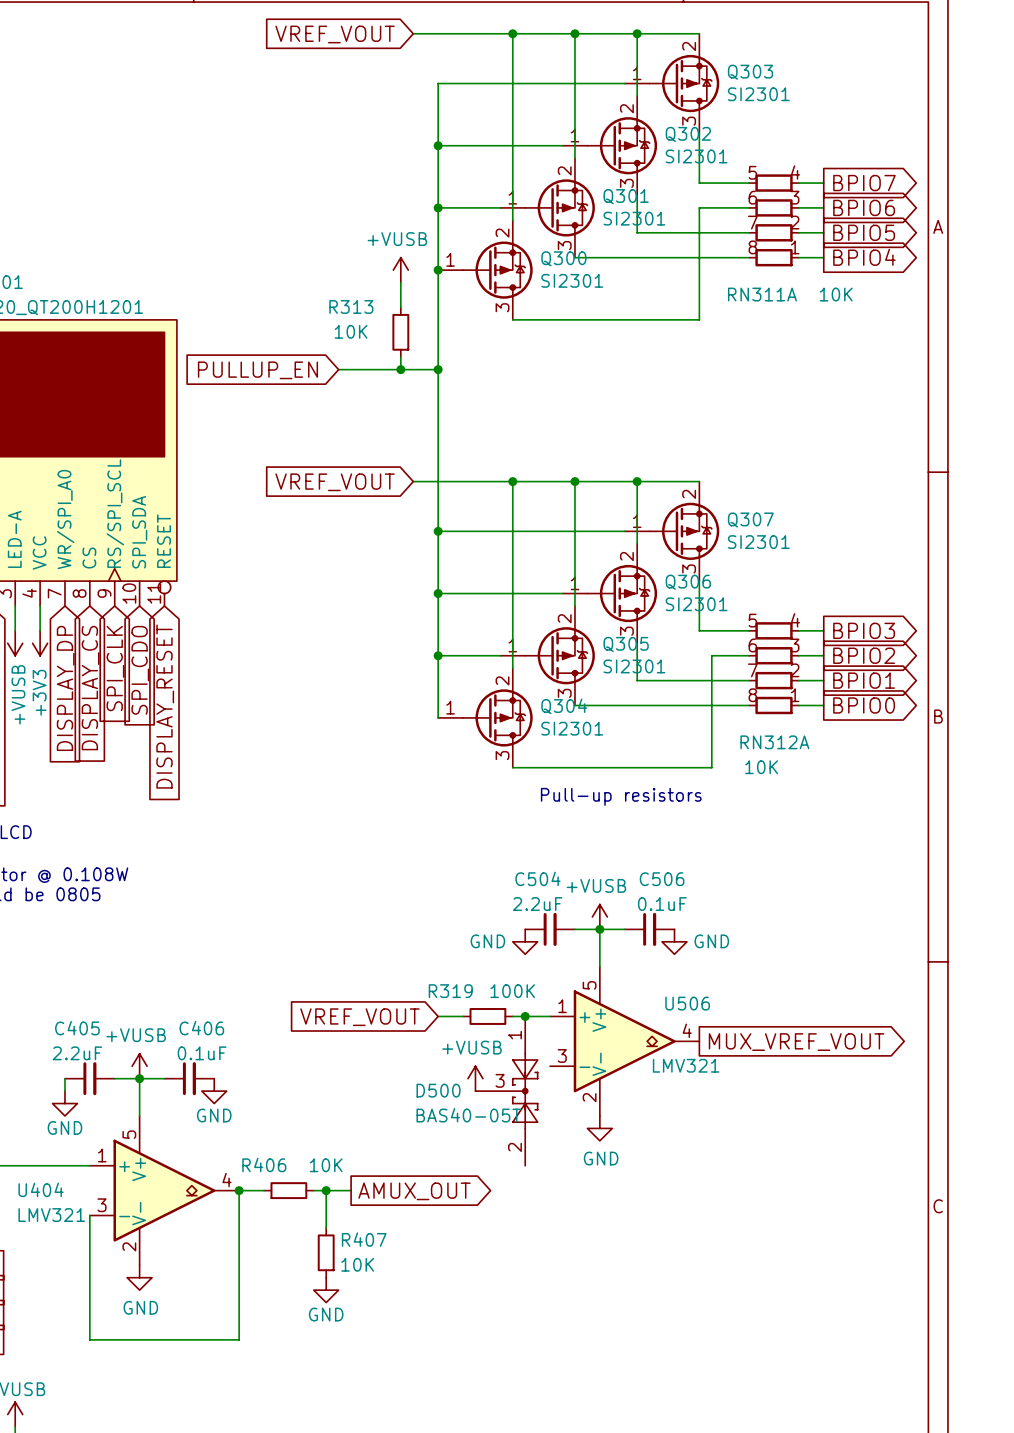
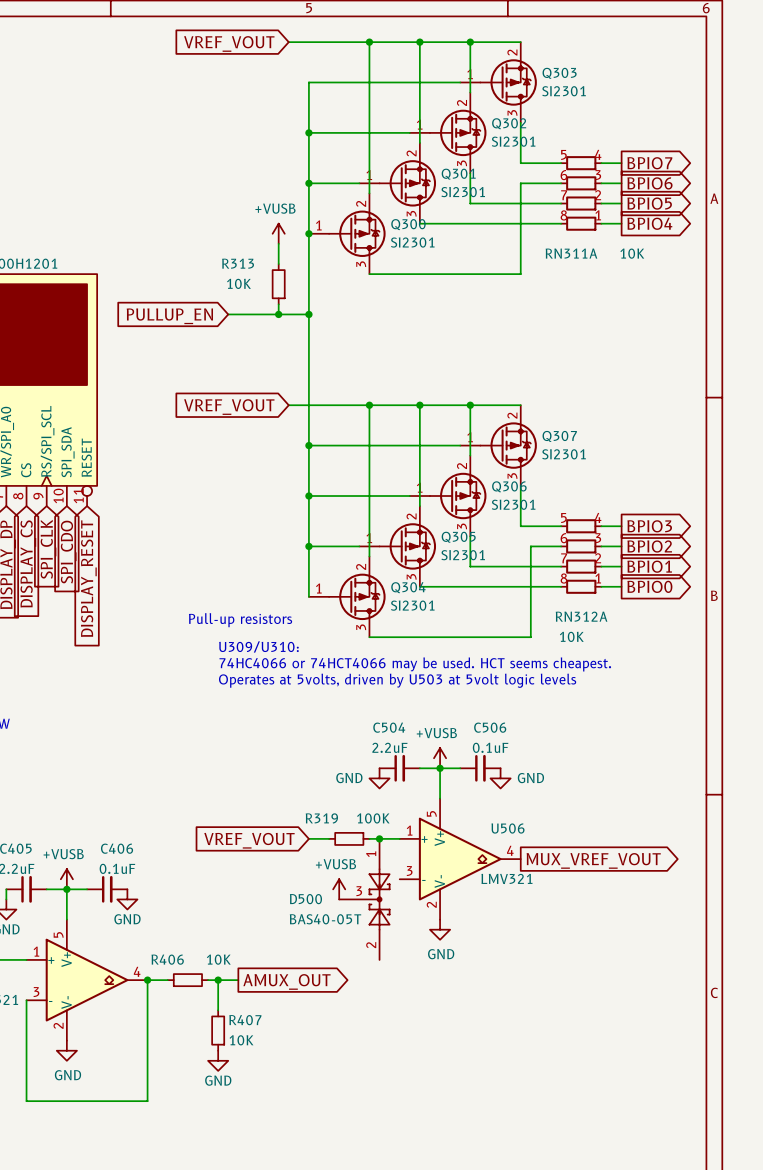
text: none -> Pull-up resistors (240, 620)
text: none -> U309/U310: (258, 646)
text: Pull-up resistors (621, 796) -> none
text: none -> 74HC4066 or 74HCT4066 may be used. HCT seems cheapest. (415, 664)
text: none -> Operates at 5volts, driven by U503 at 5volt logic levels (397, 680)

